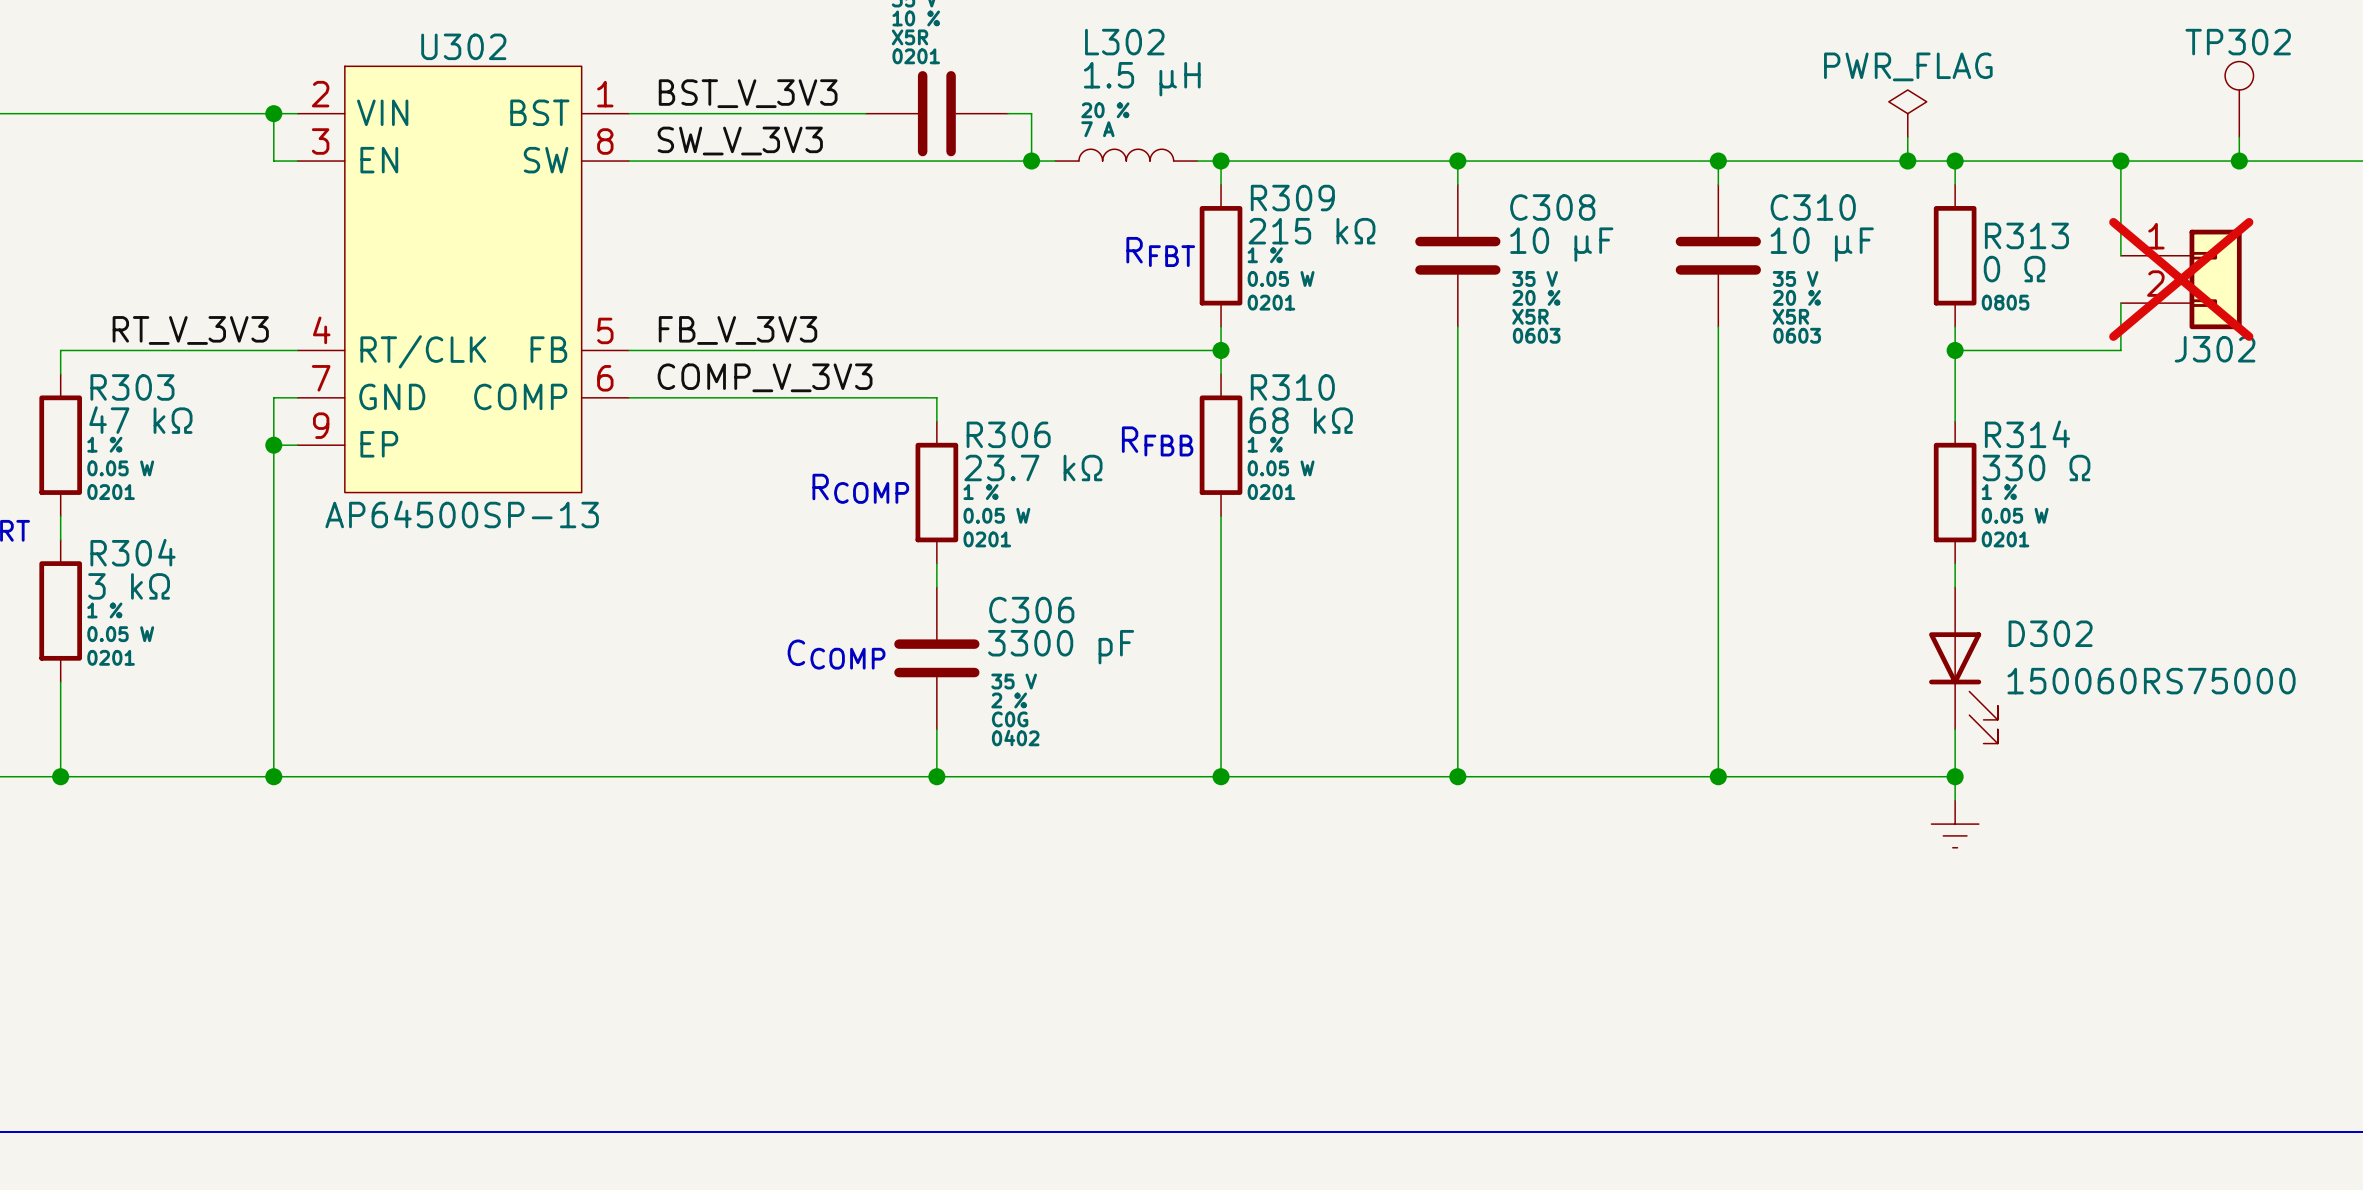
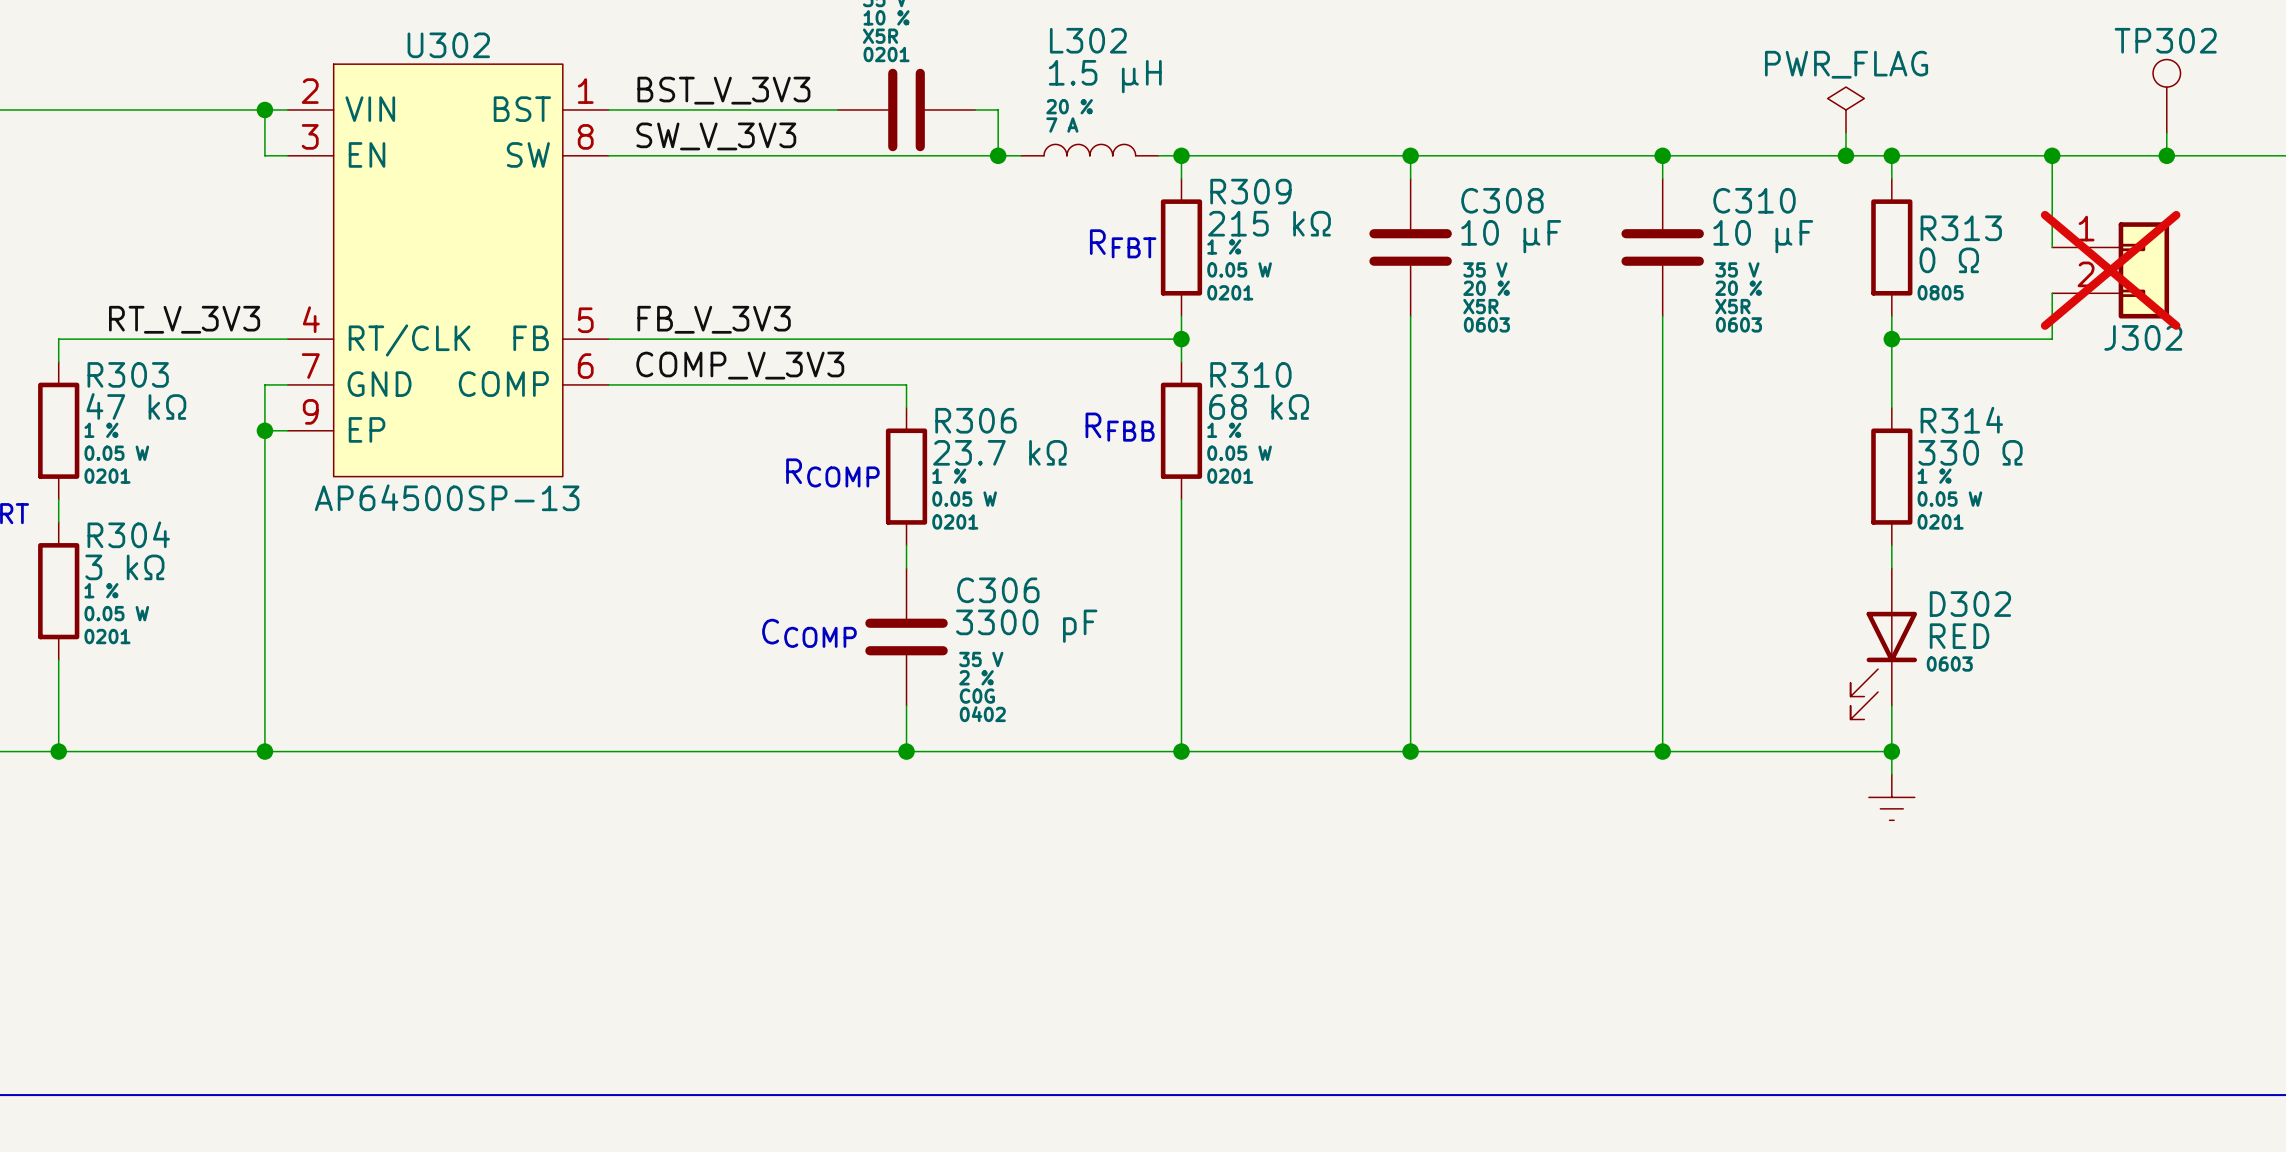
D302 value: 150060RS75000 (2151, 681) -> RED (1959, 636)
D302 text: none -> 0603 (1949, 664)
D302 flip: as is (1963, 687) -> left-right (1883, 665)

